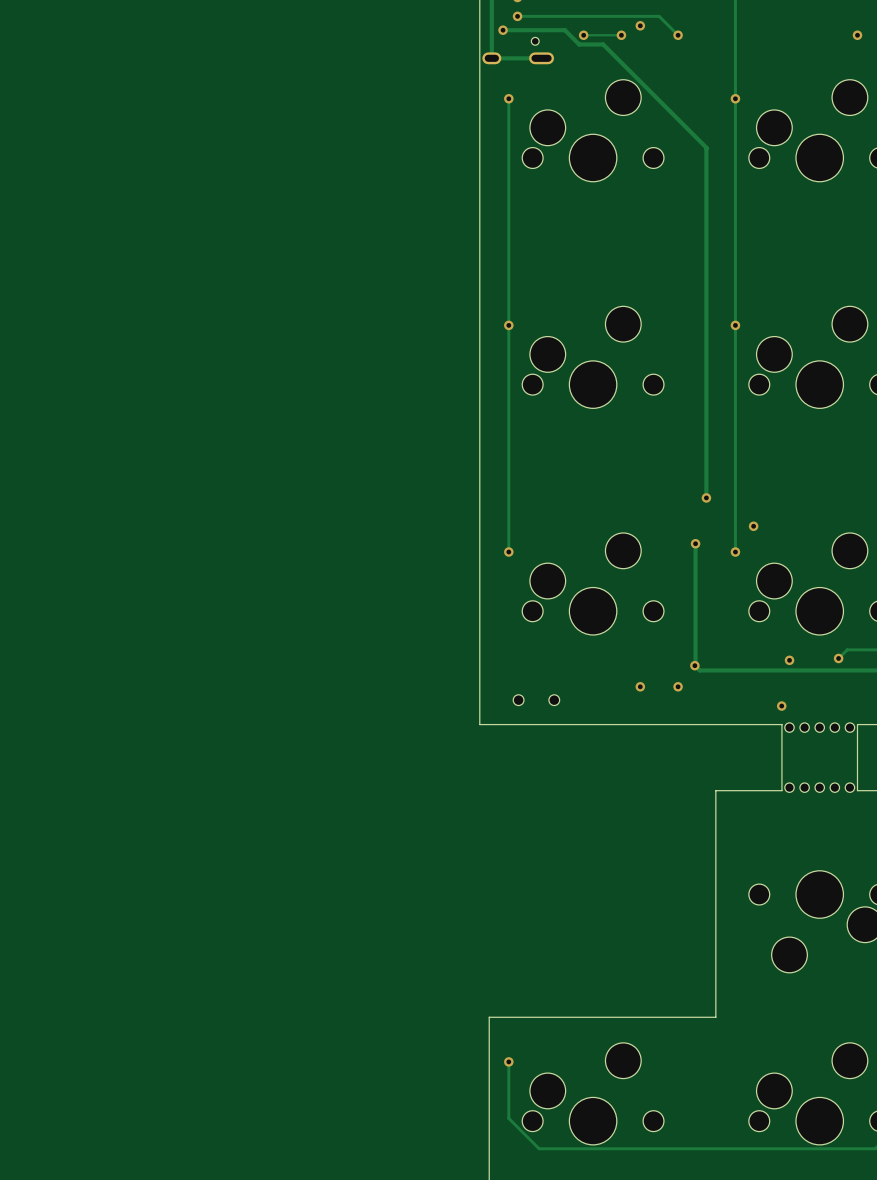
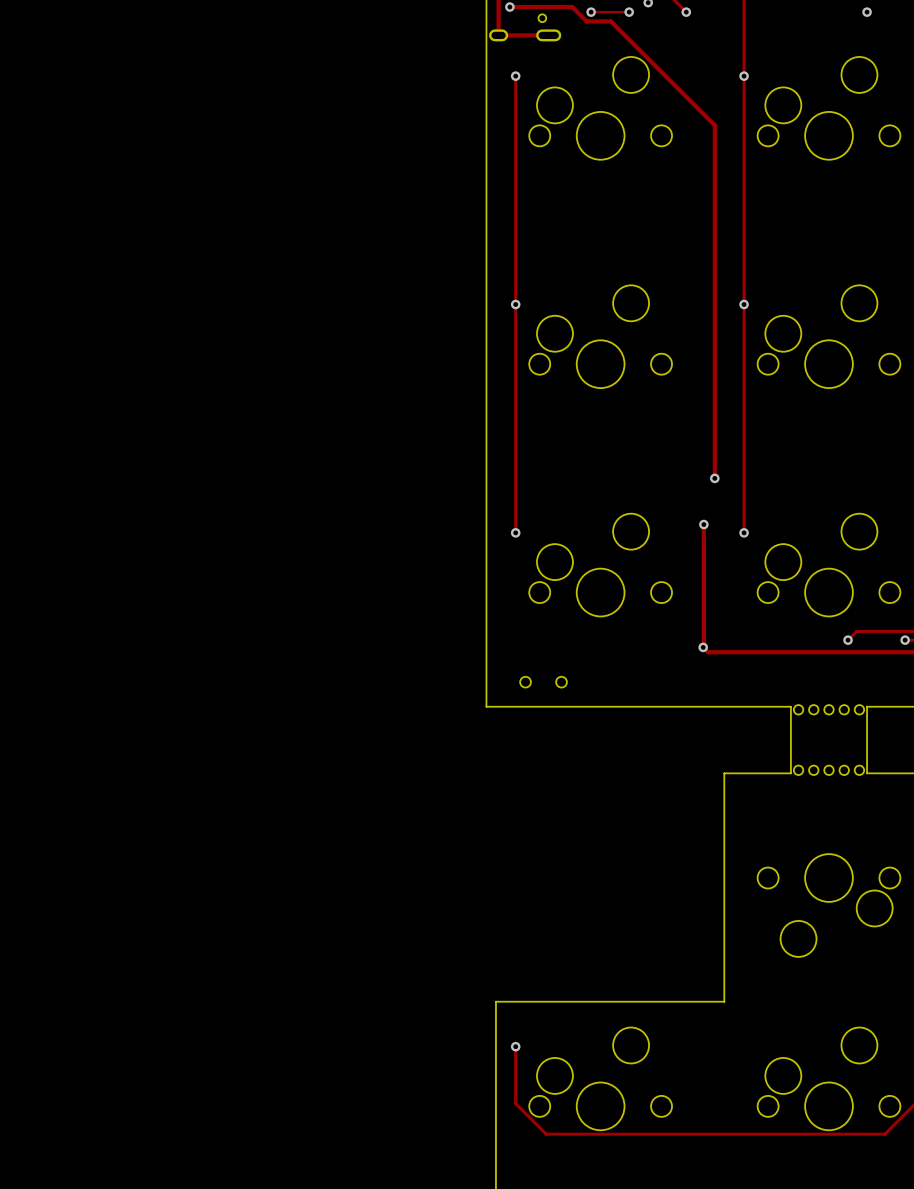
via: (753, 526) -> none
via: (789, 660) -> none
via: (640, 686) -> none
via: (678, 686) -> none
via: (781, 706) -> none

